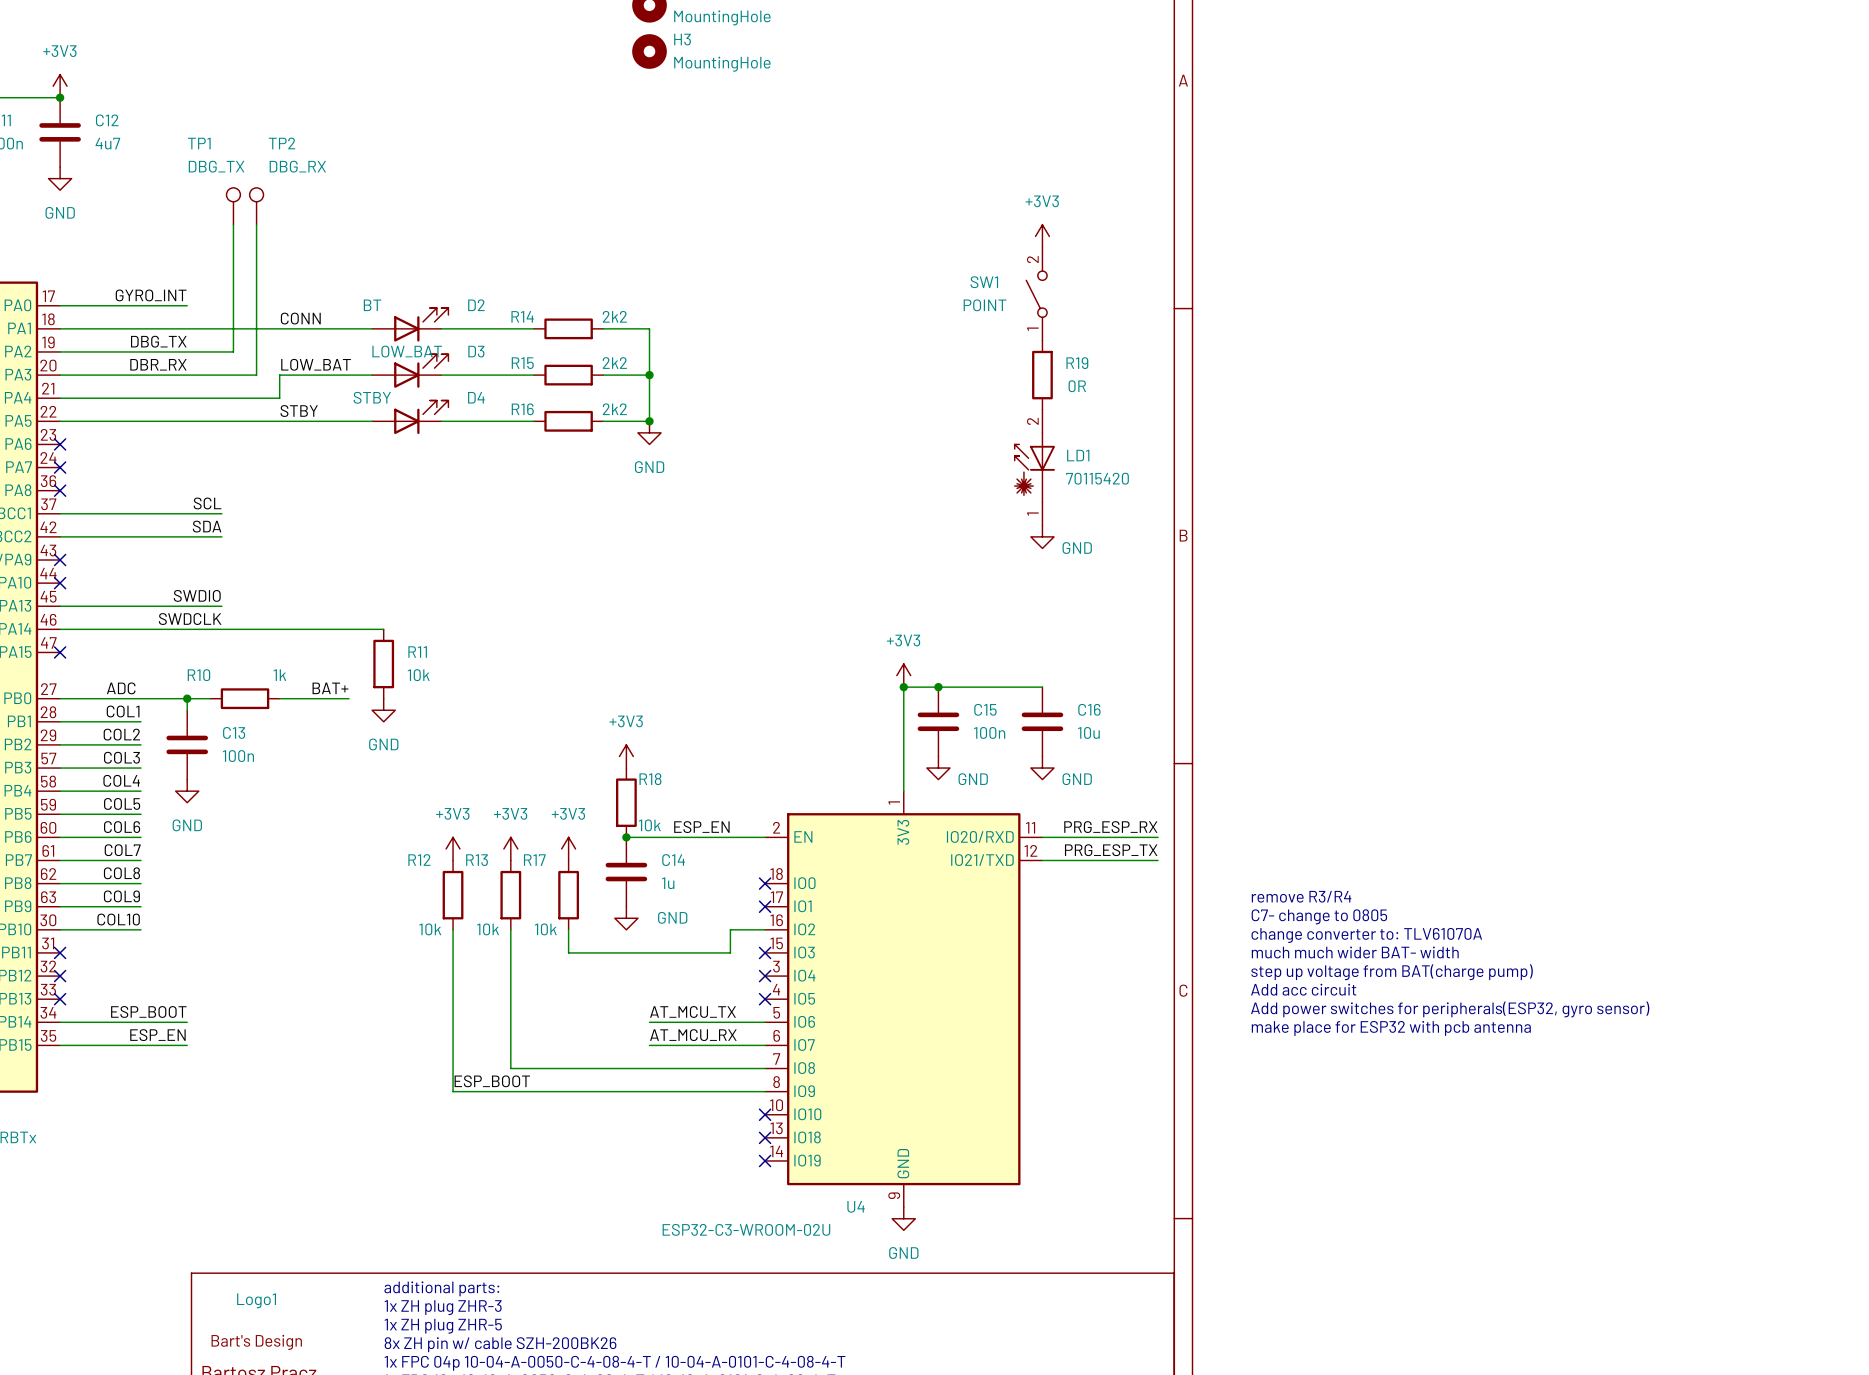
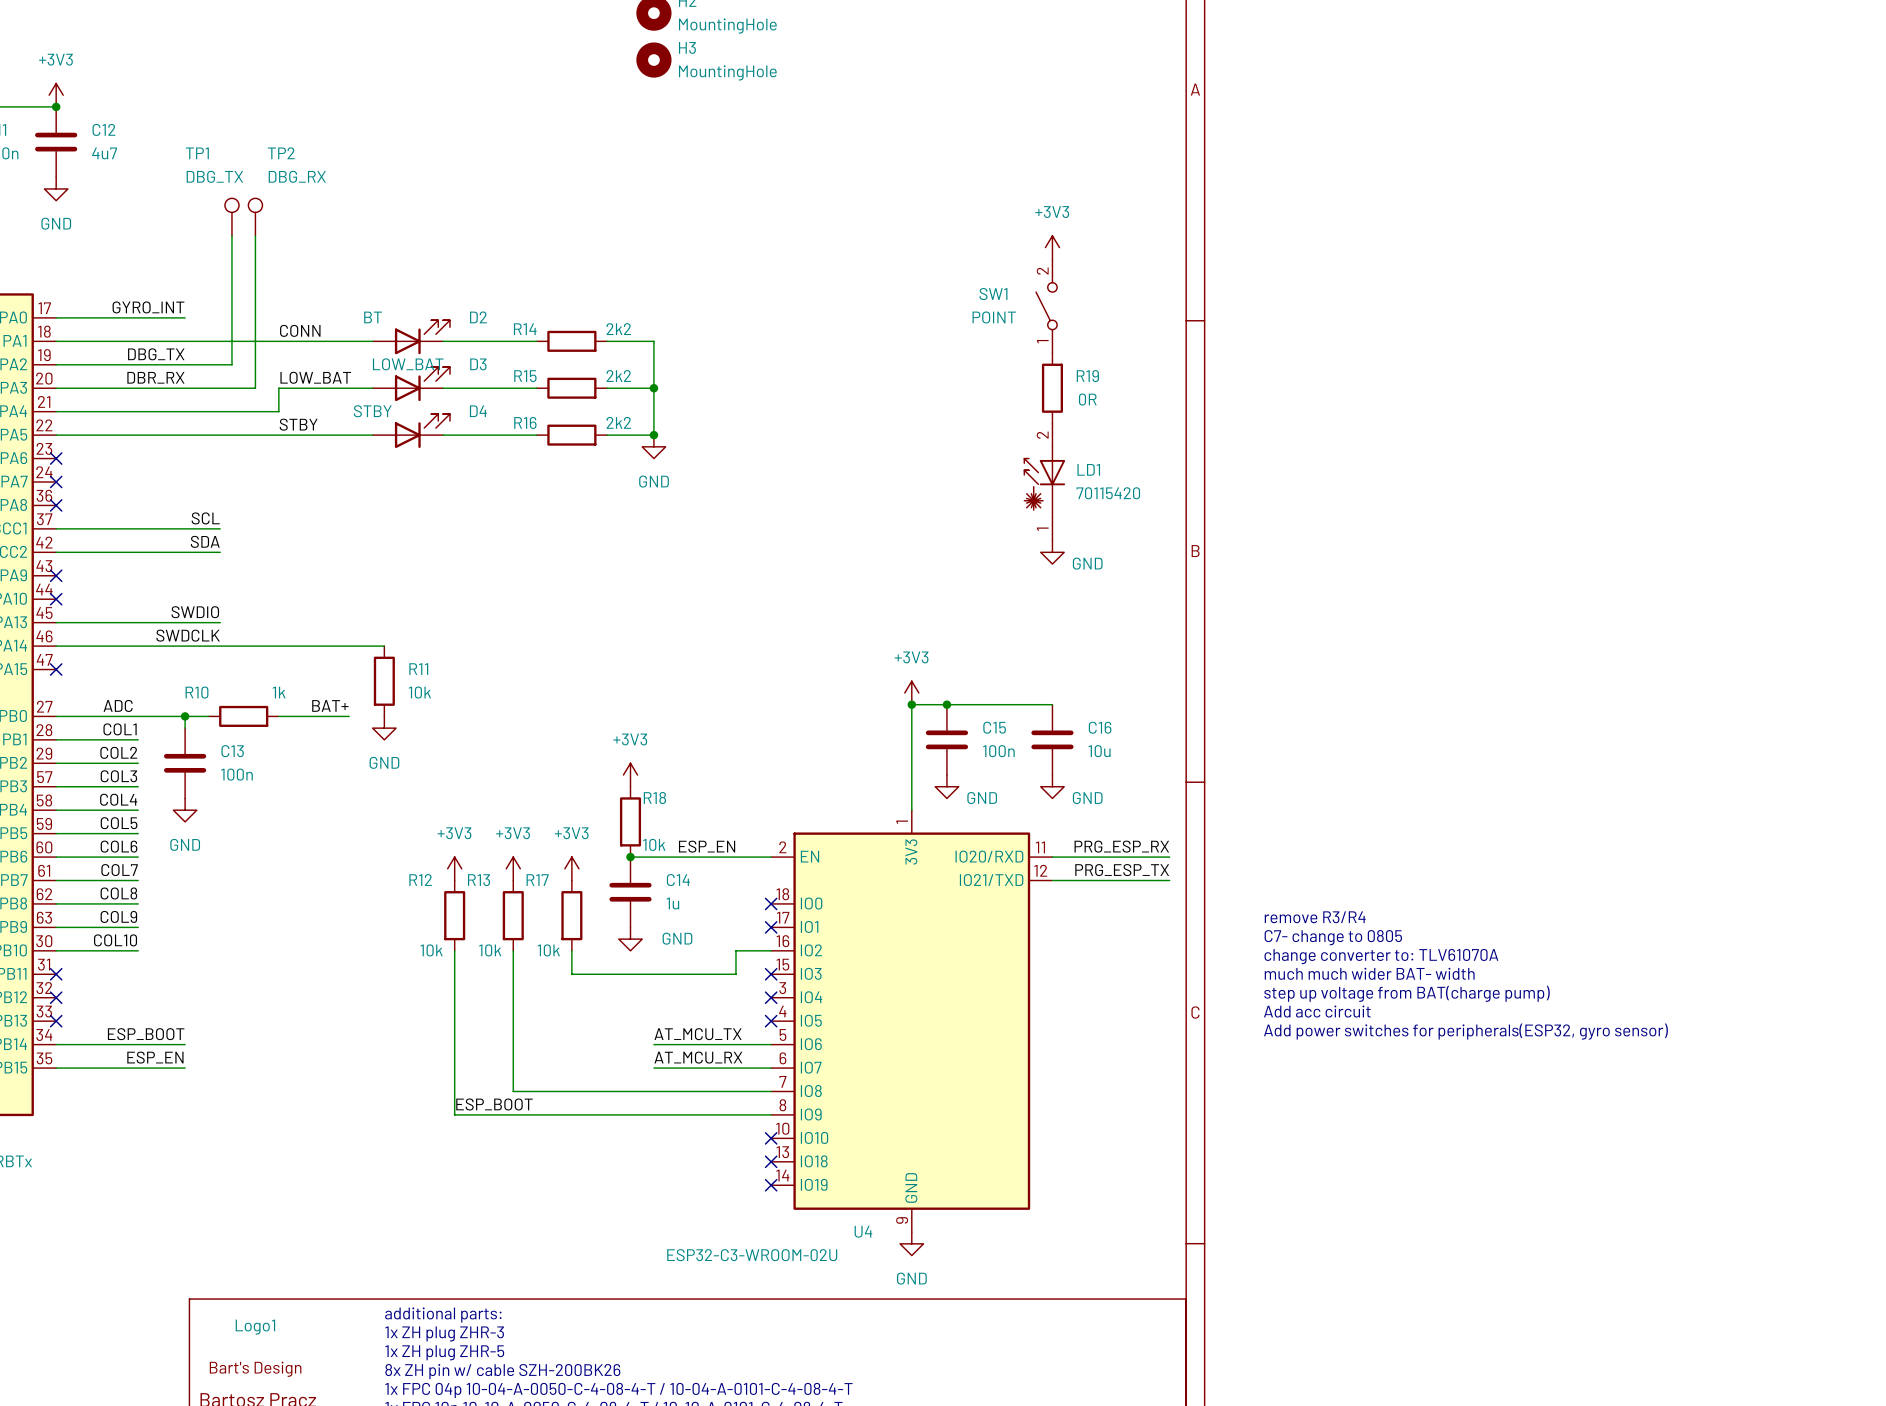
text: make place for ESP32 with pcb antenna (1391, 1028) -> none

